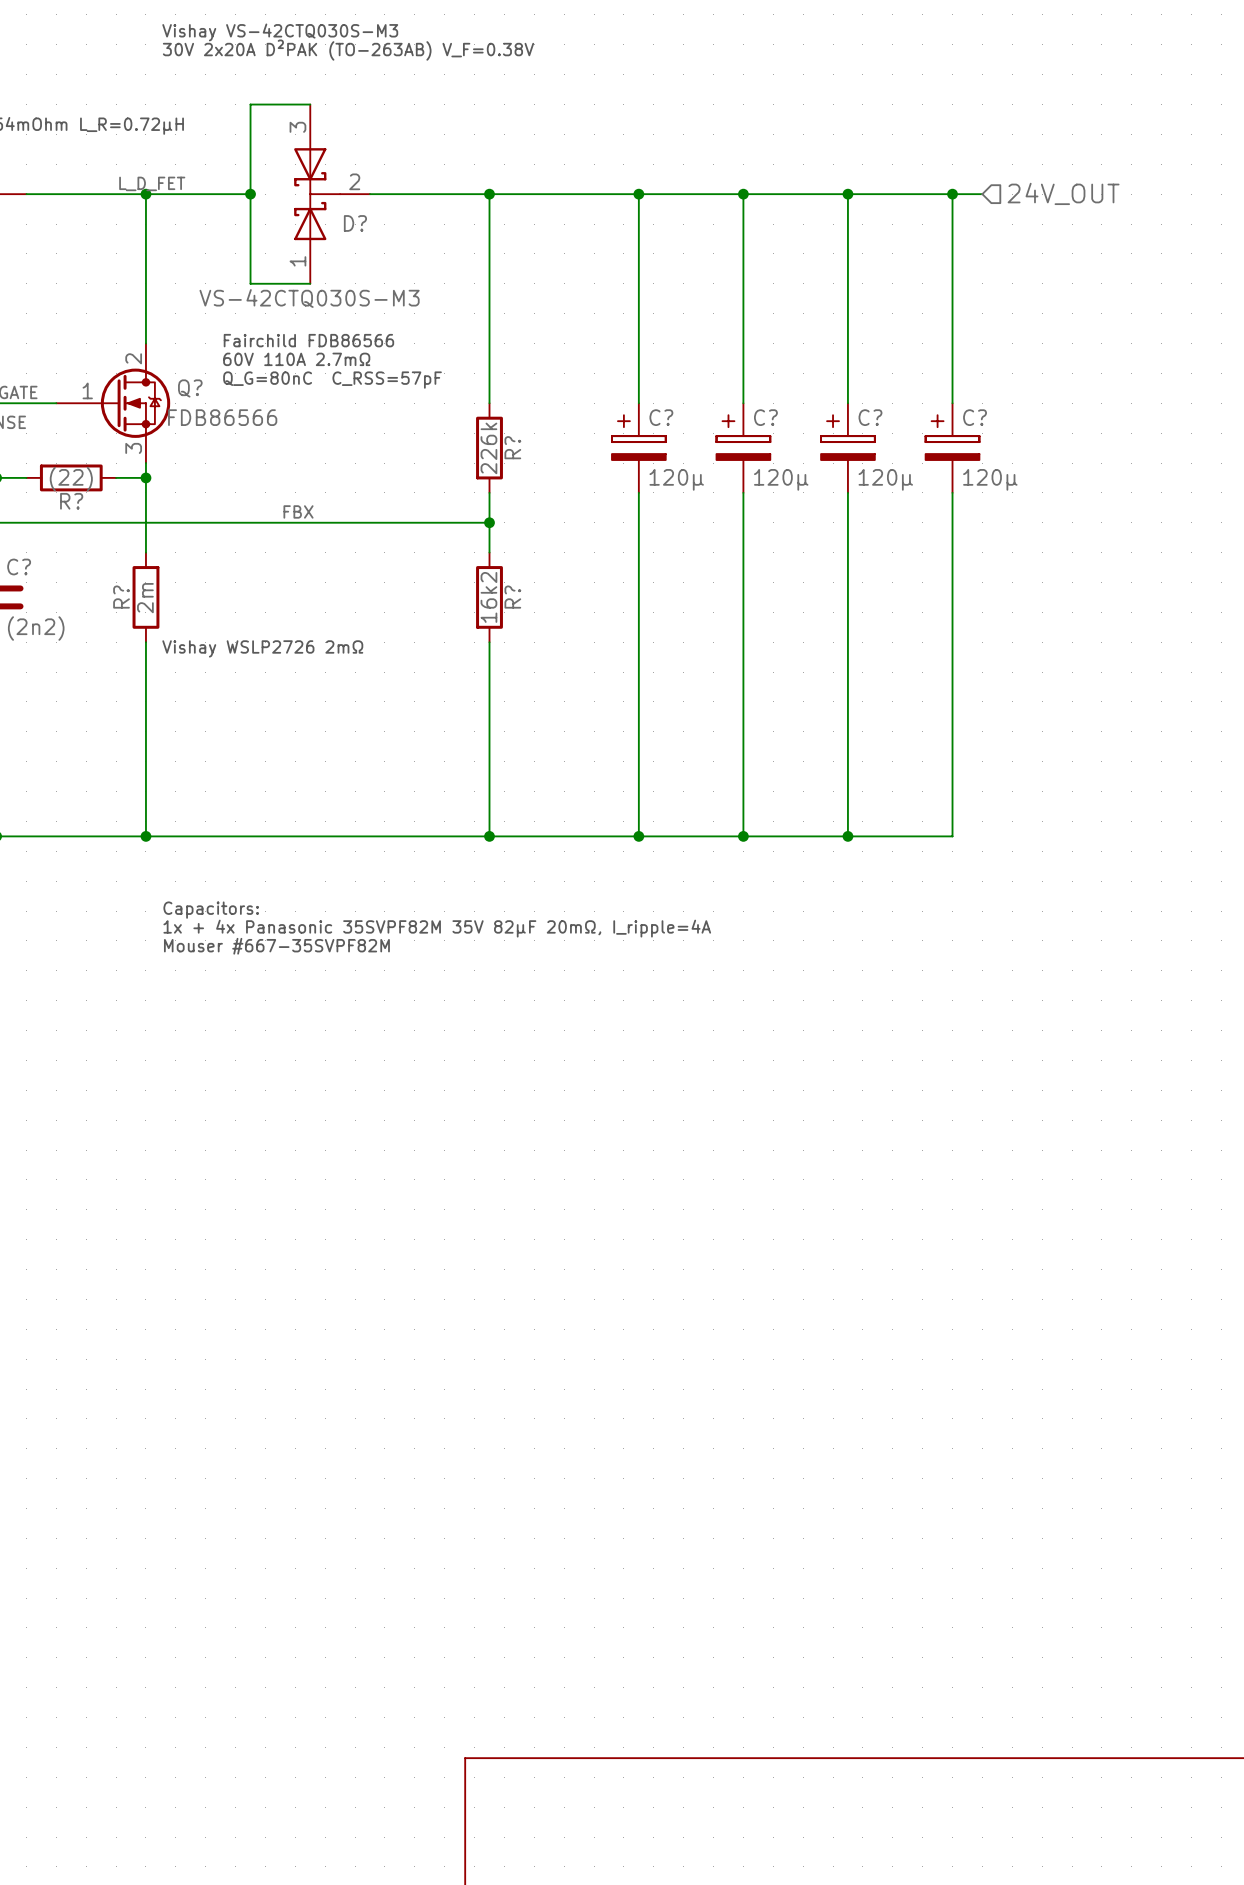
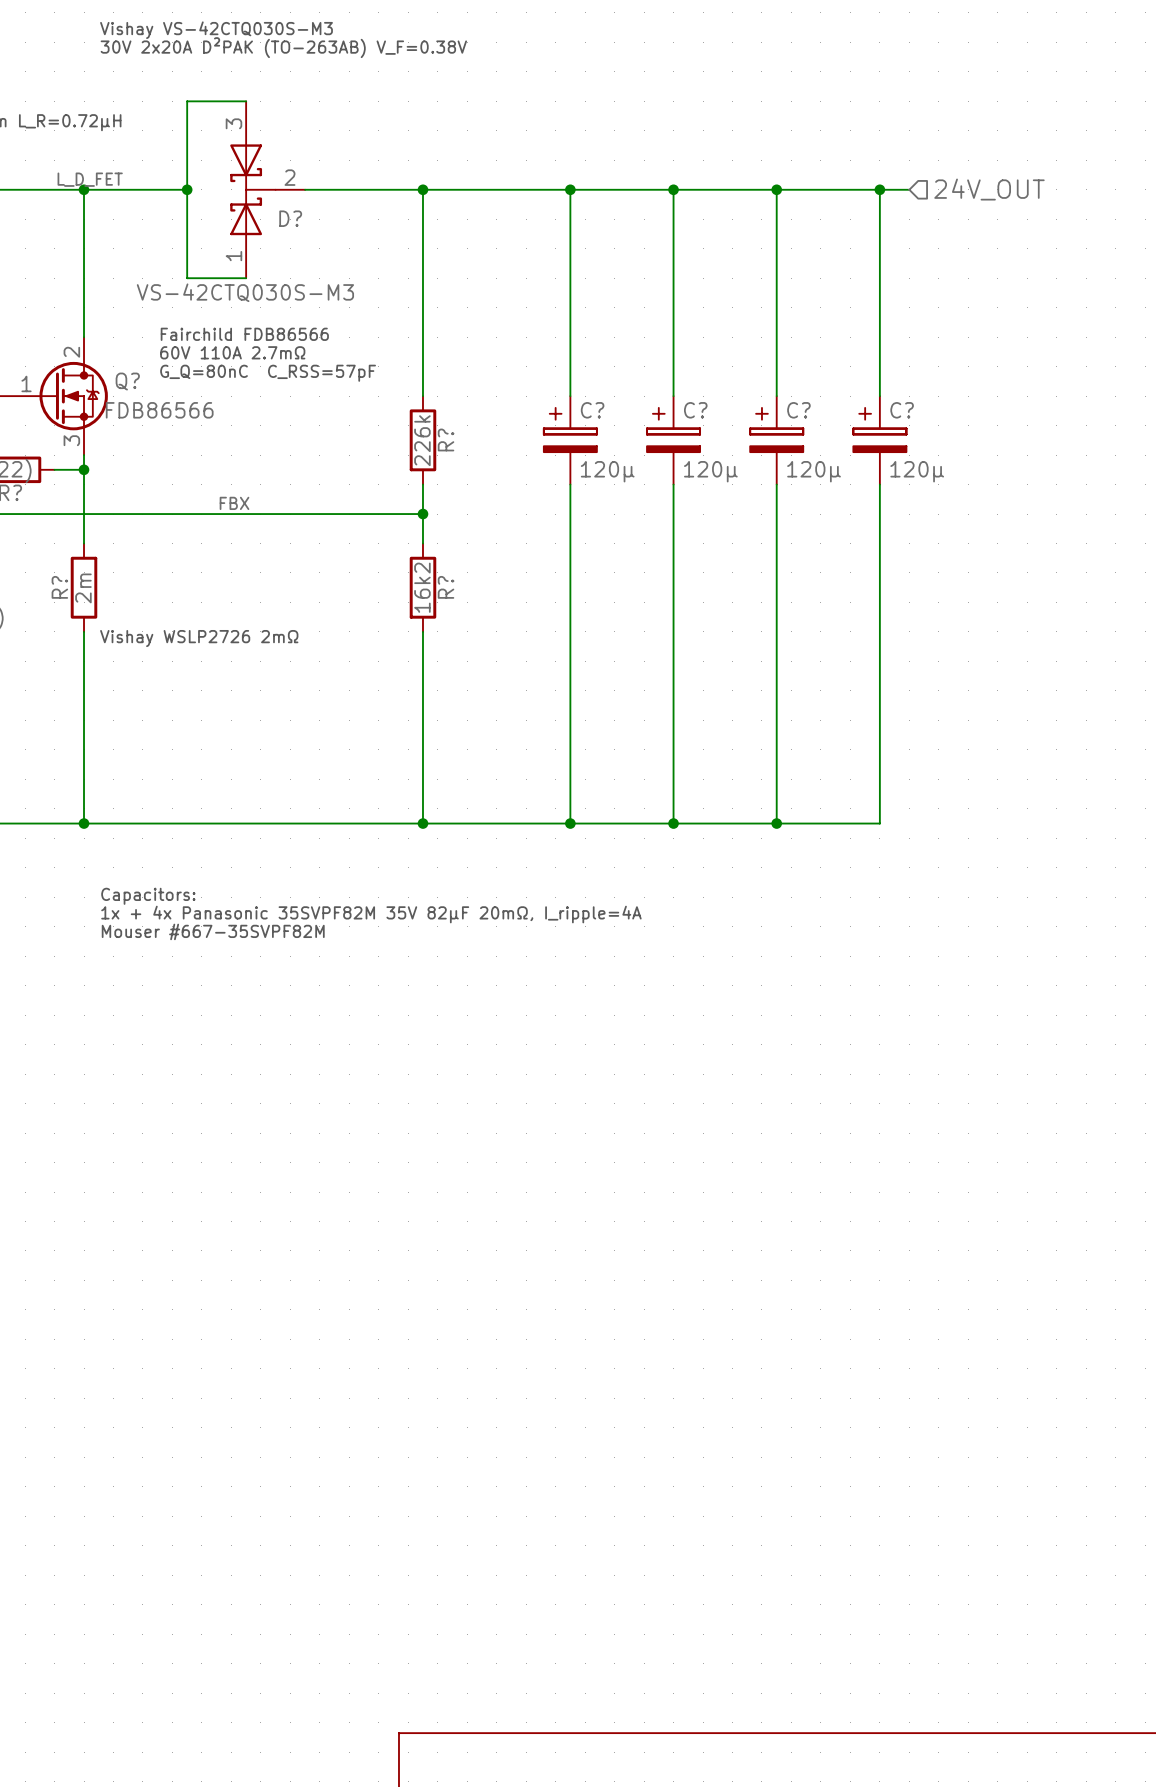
text: Q_G=80nC C_RSS=57pF (332, 380) -> G_Q=80nC C_RSS=57pF (268, 373)

